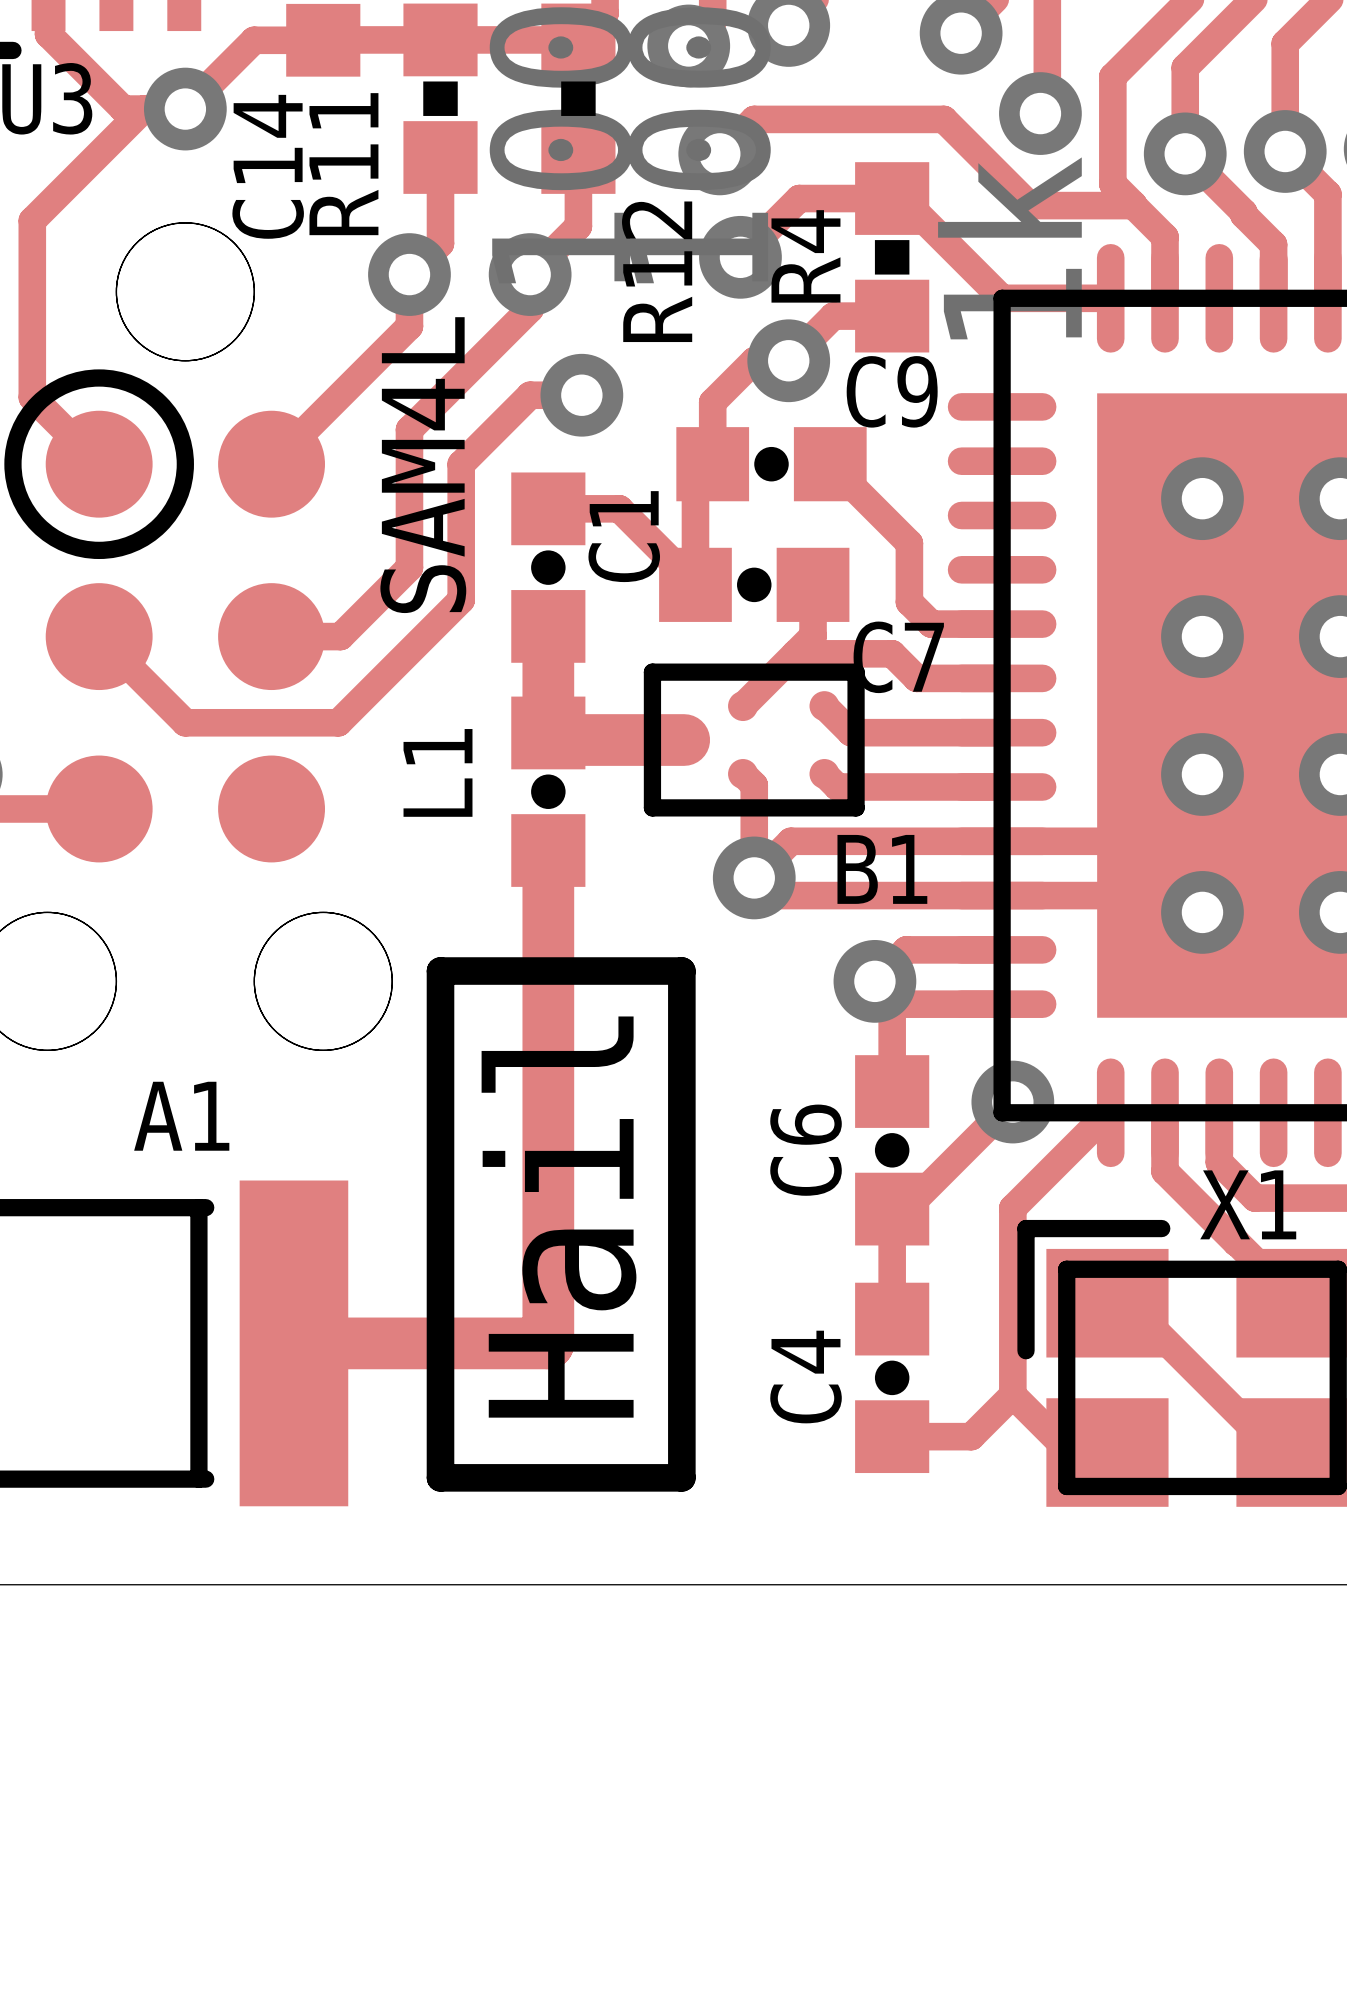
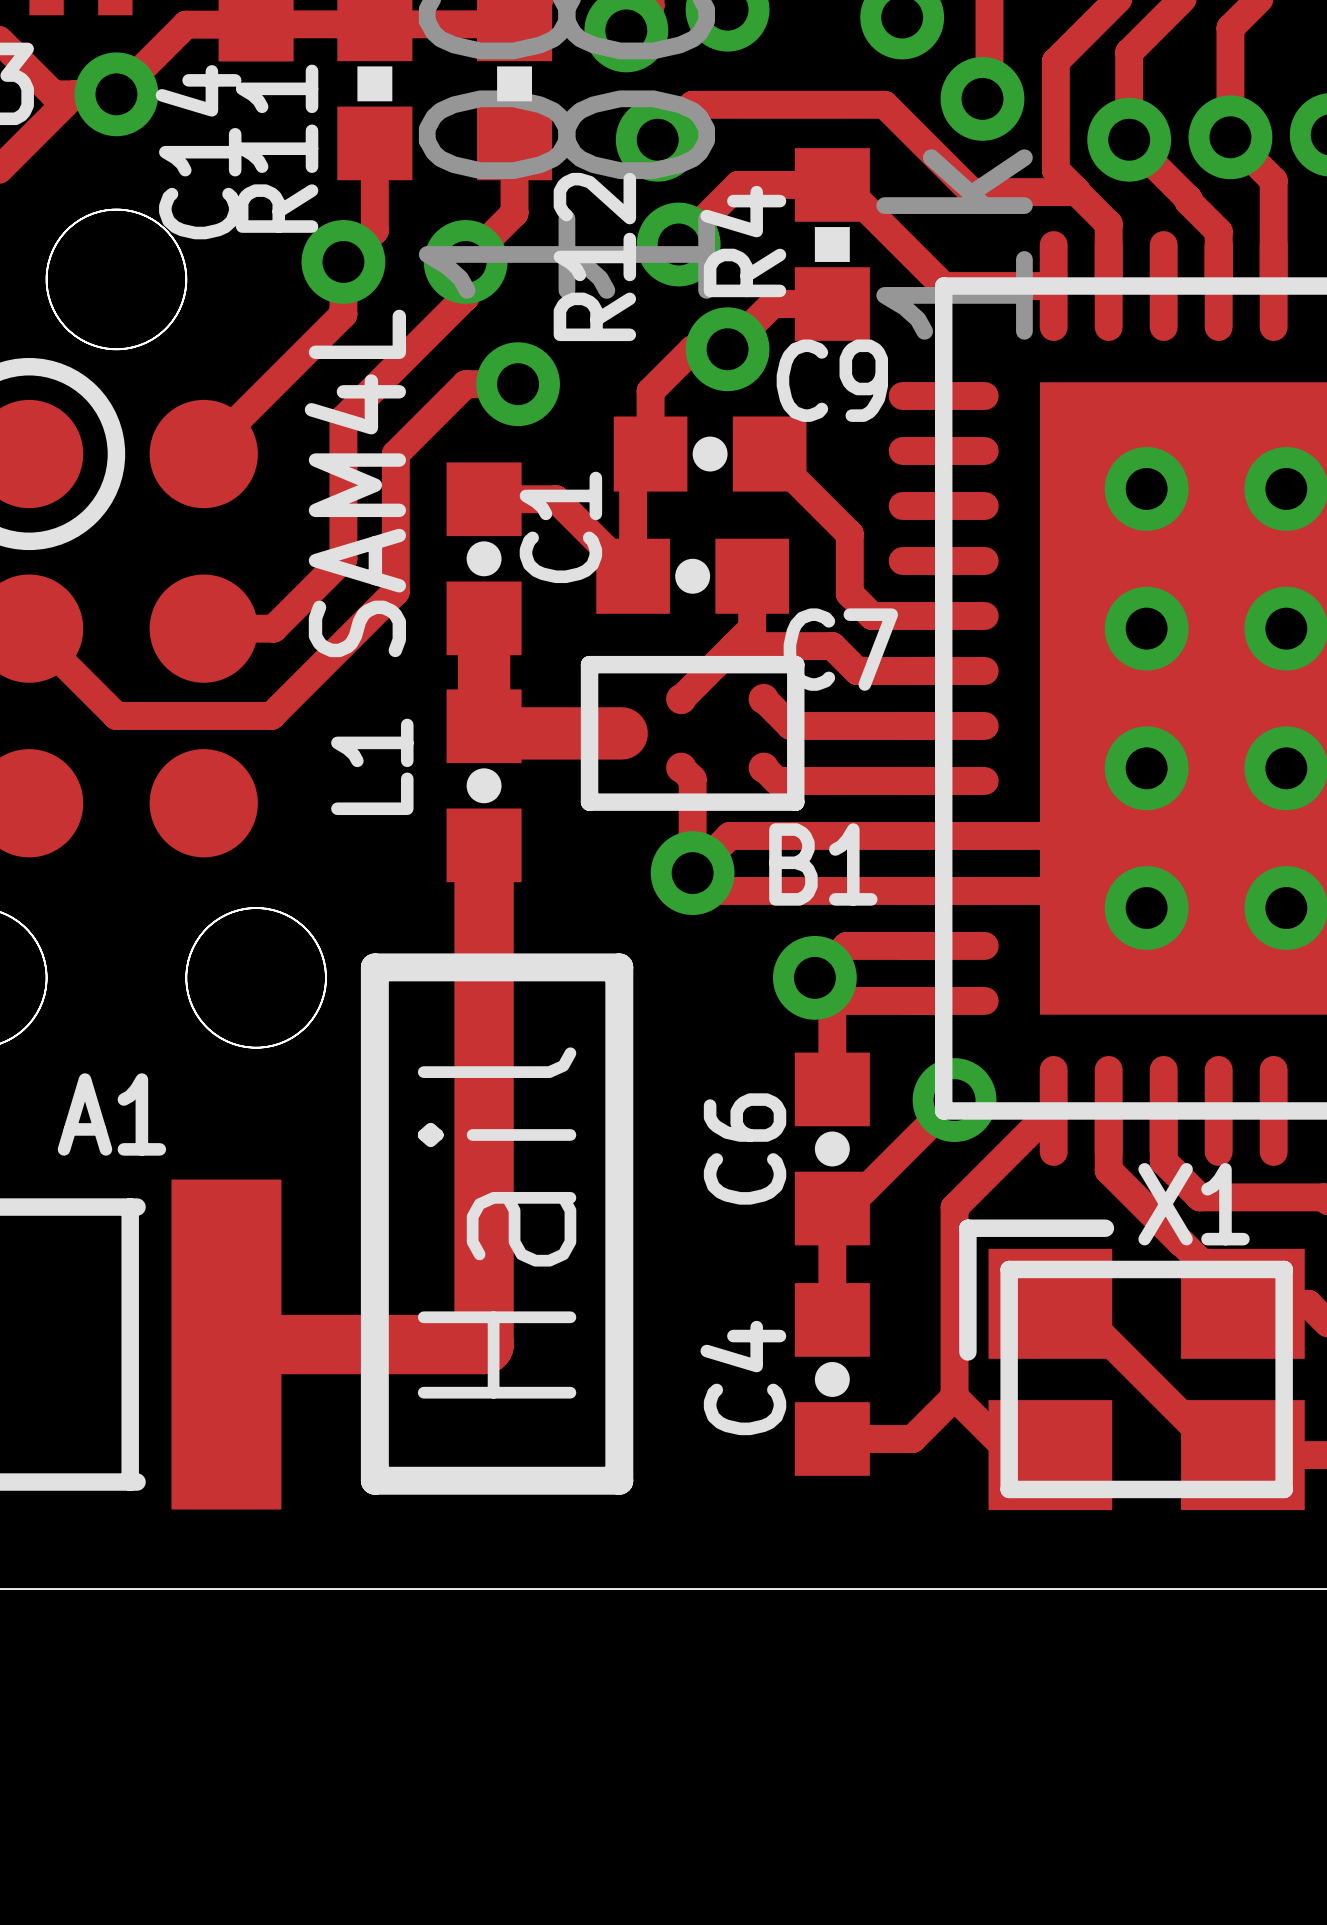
track width: thin (548, 850) (548, 1343) (293, 1343) -> thick (484, 845) (484, 1344) (226, 1344)

